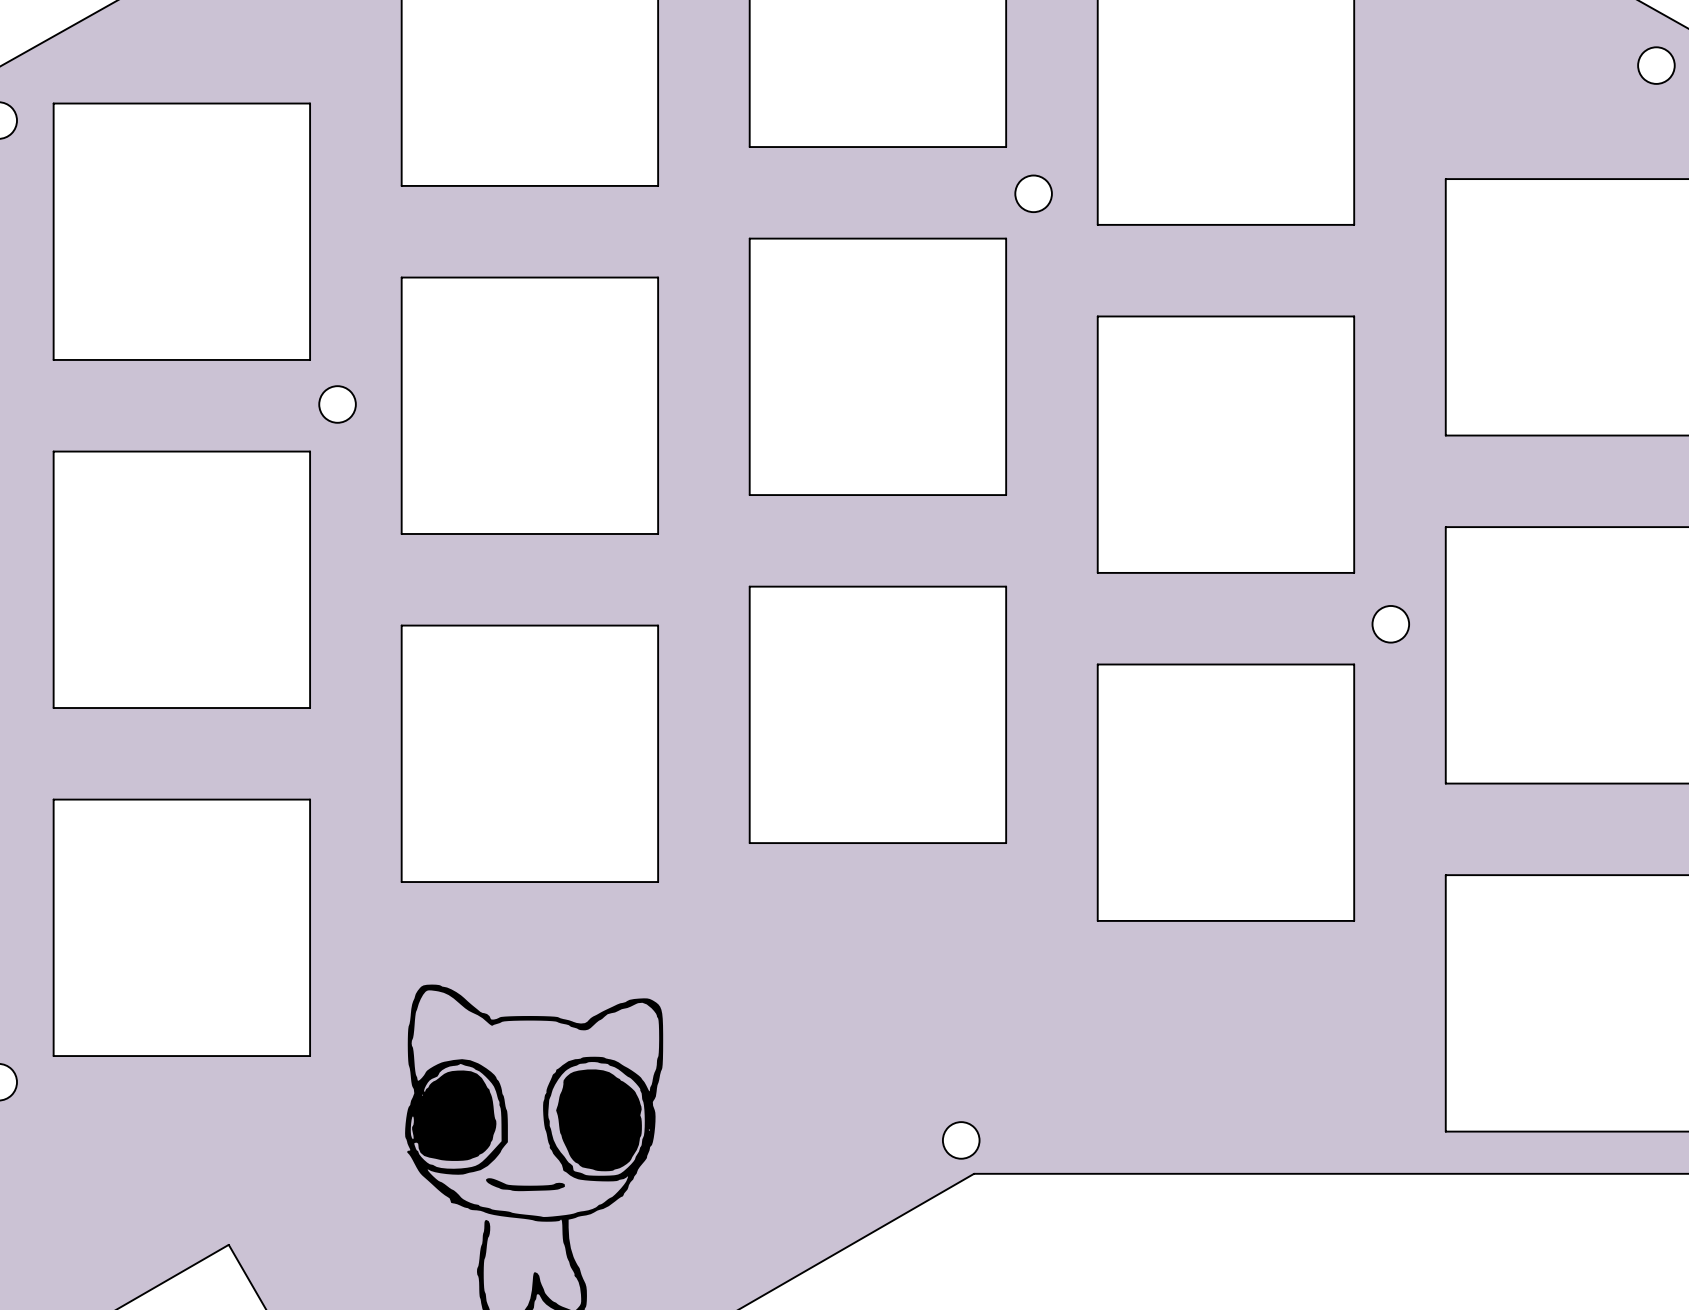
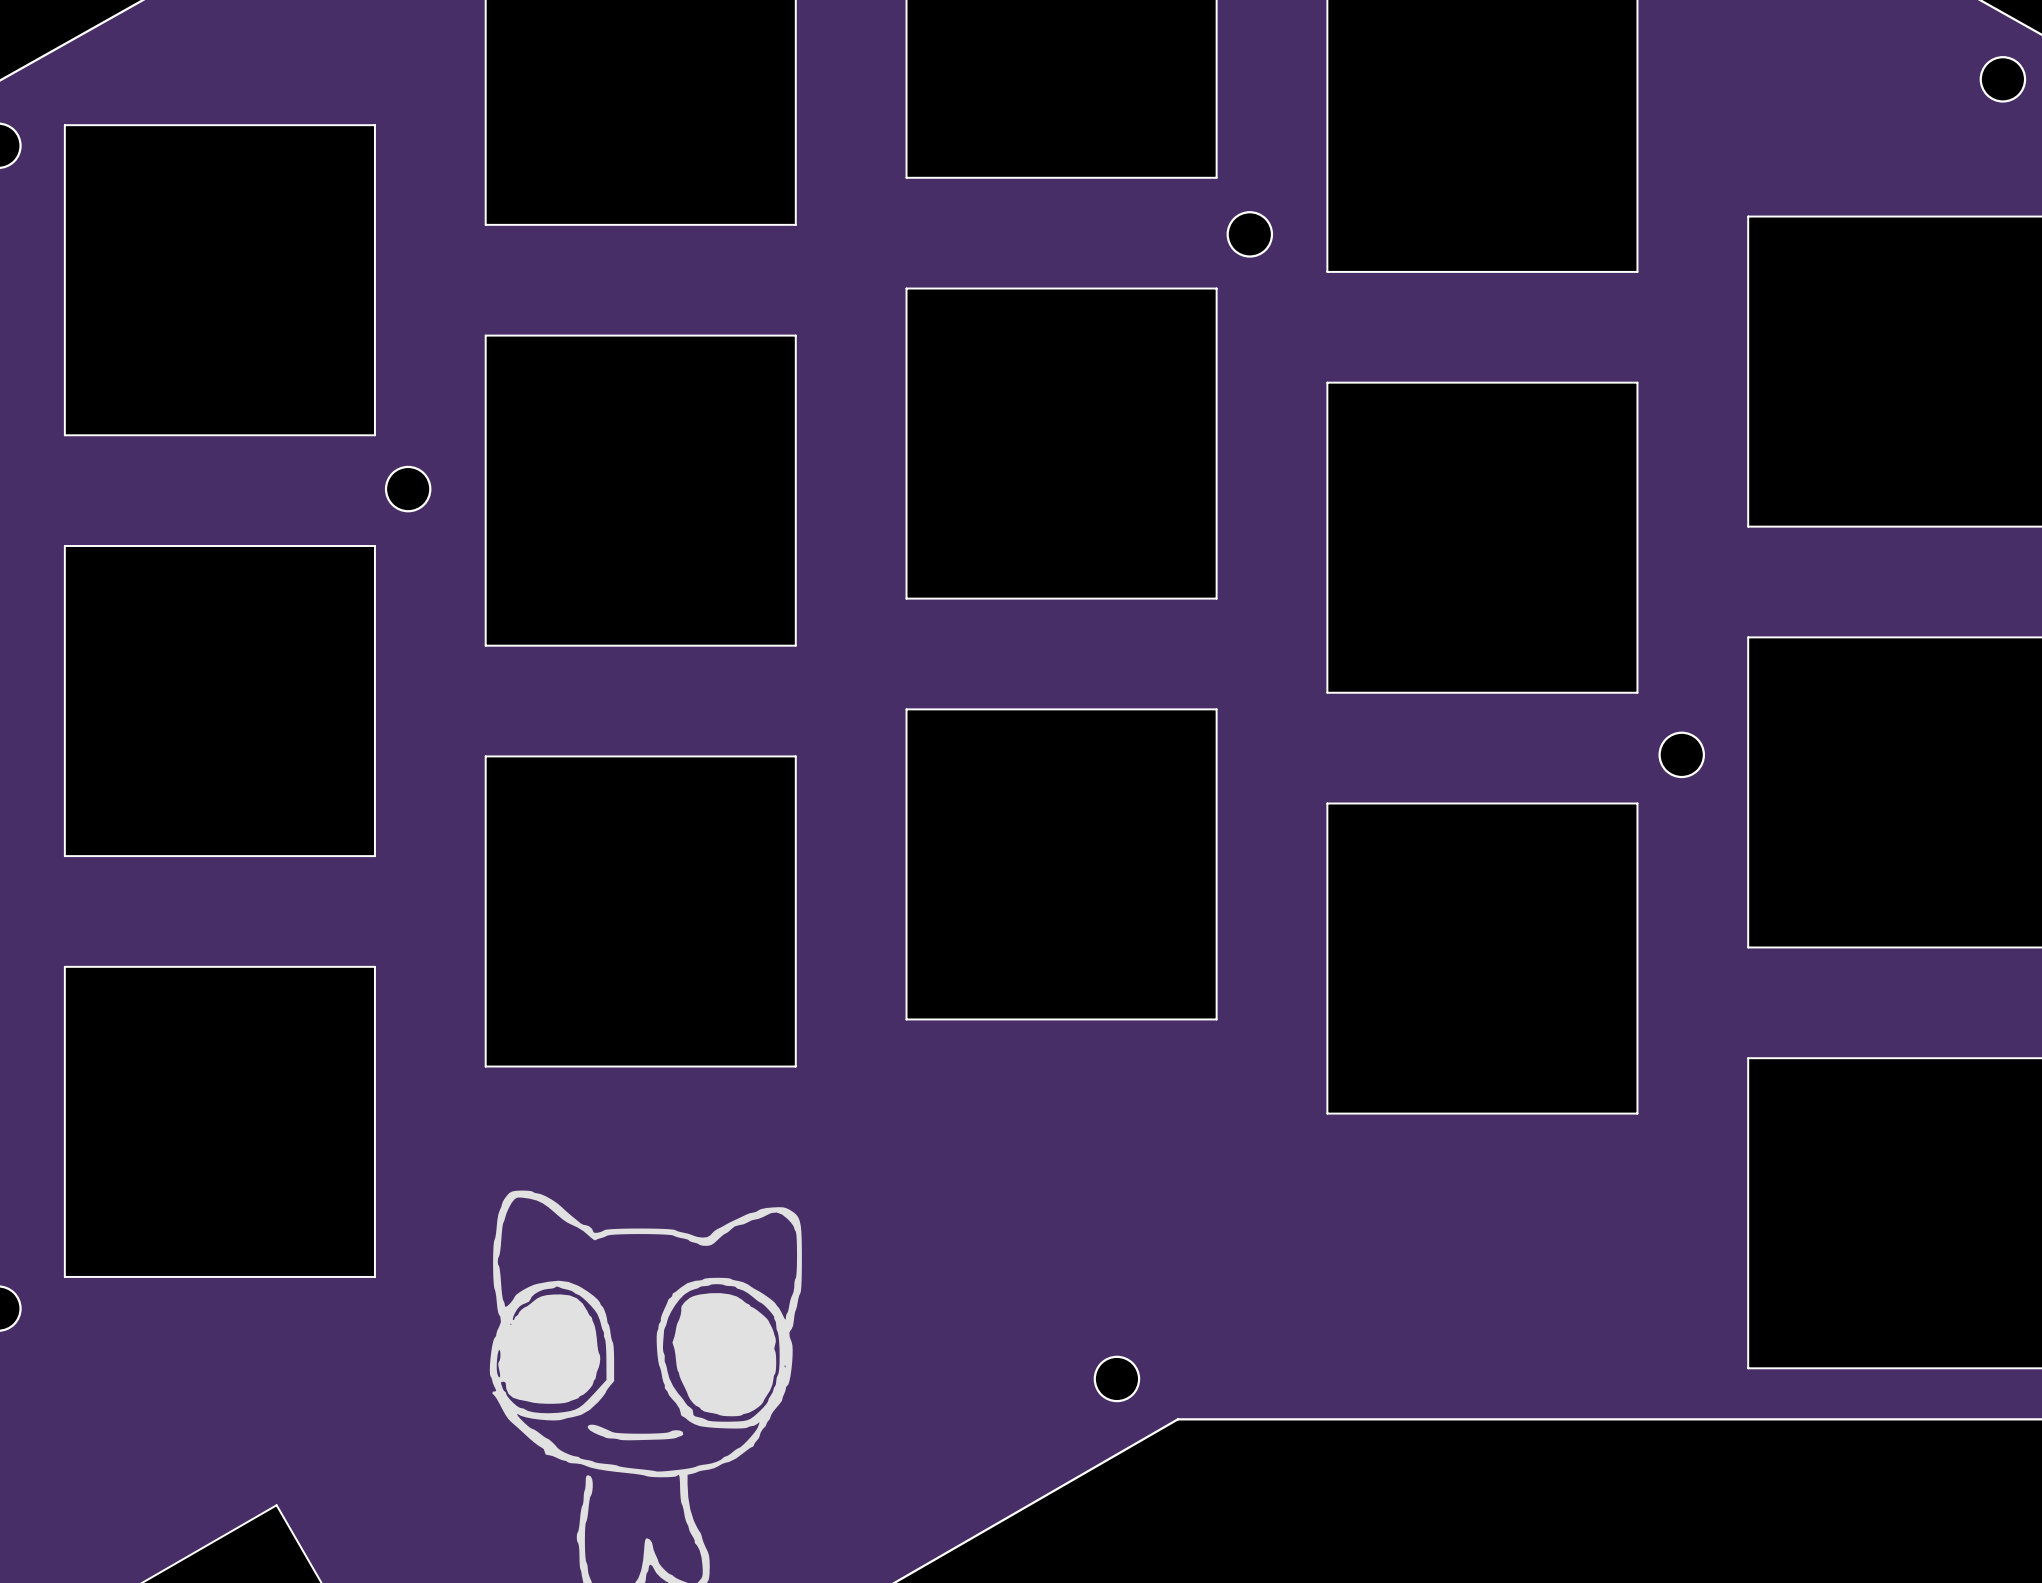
round board edge position: (961, 1140) -> (1116, 1378)

